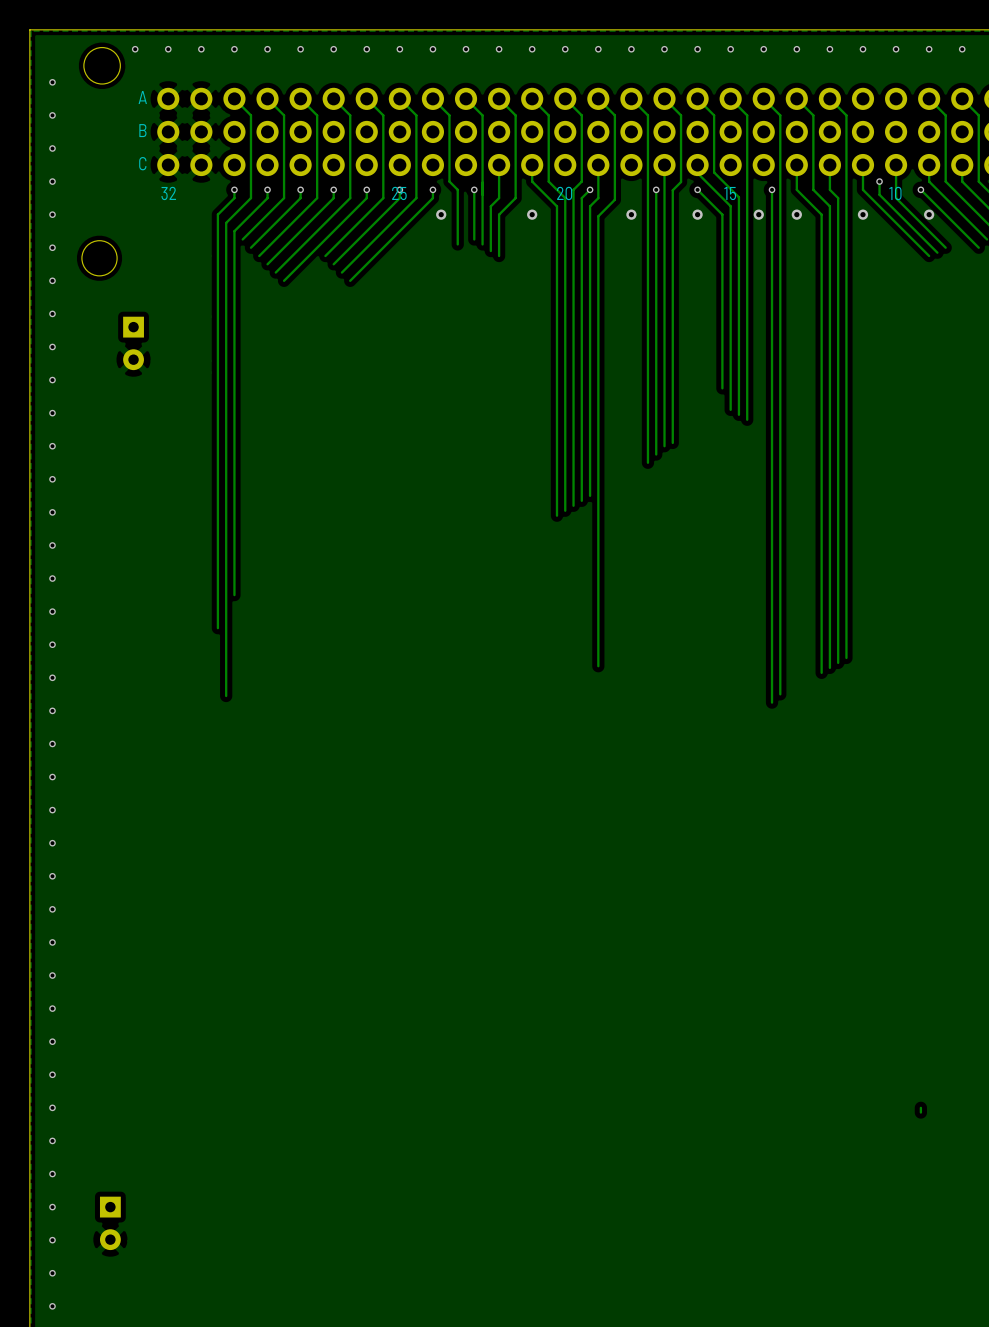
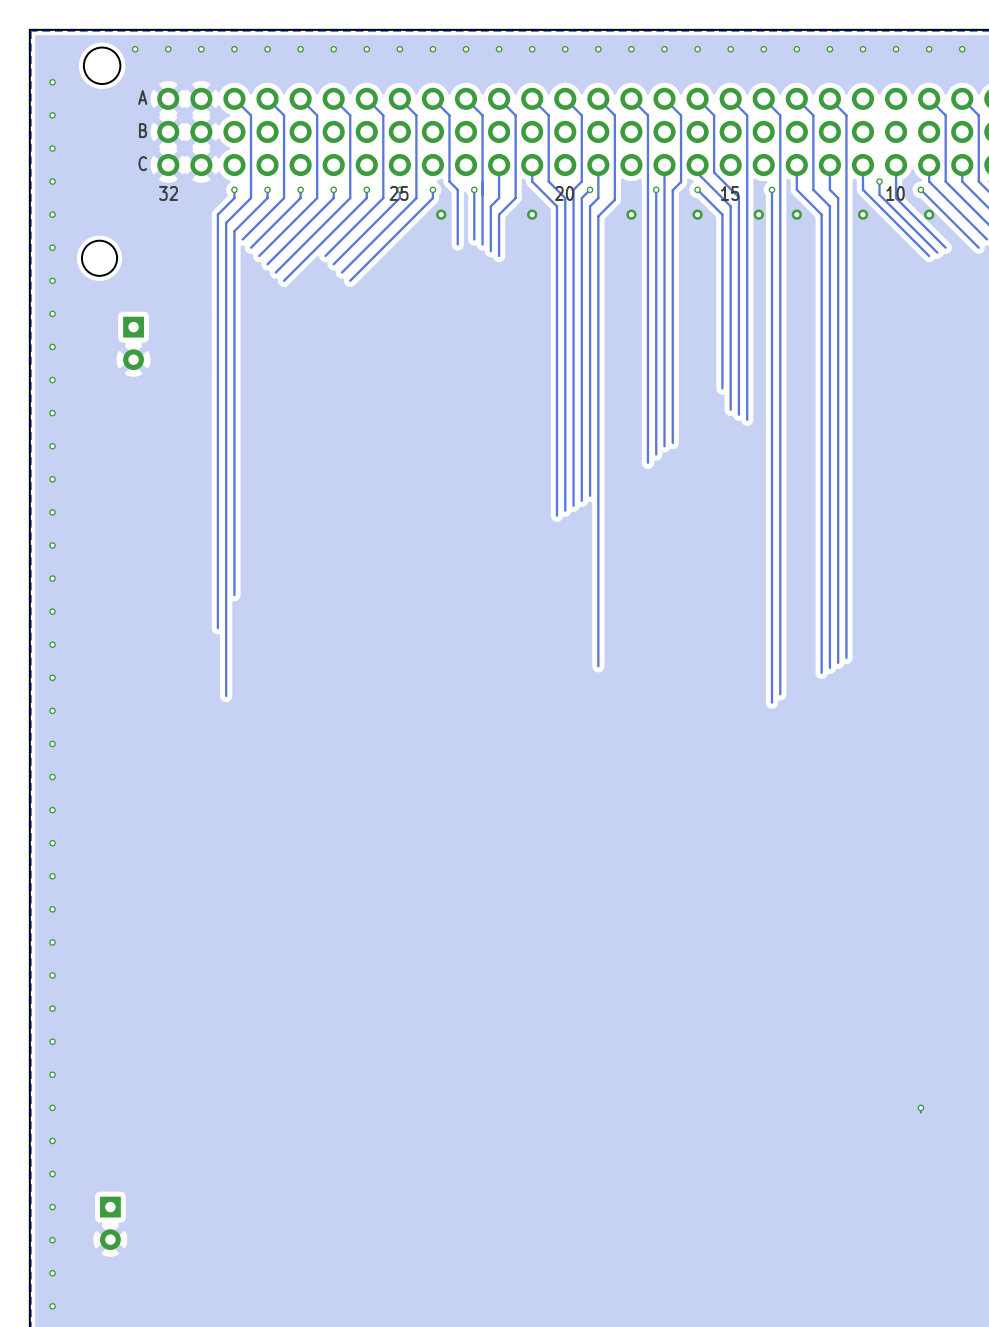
via: none -> (920, 1107)

